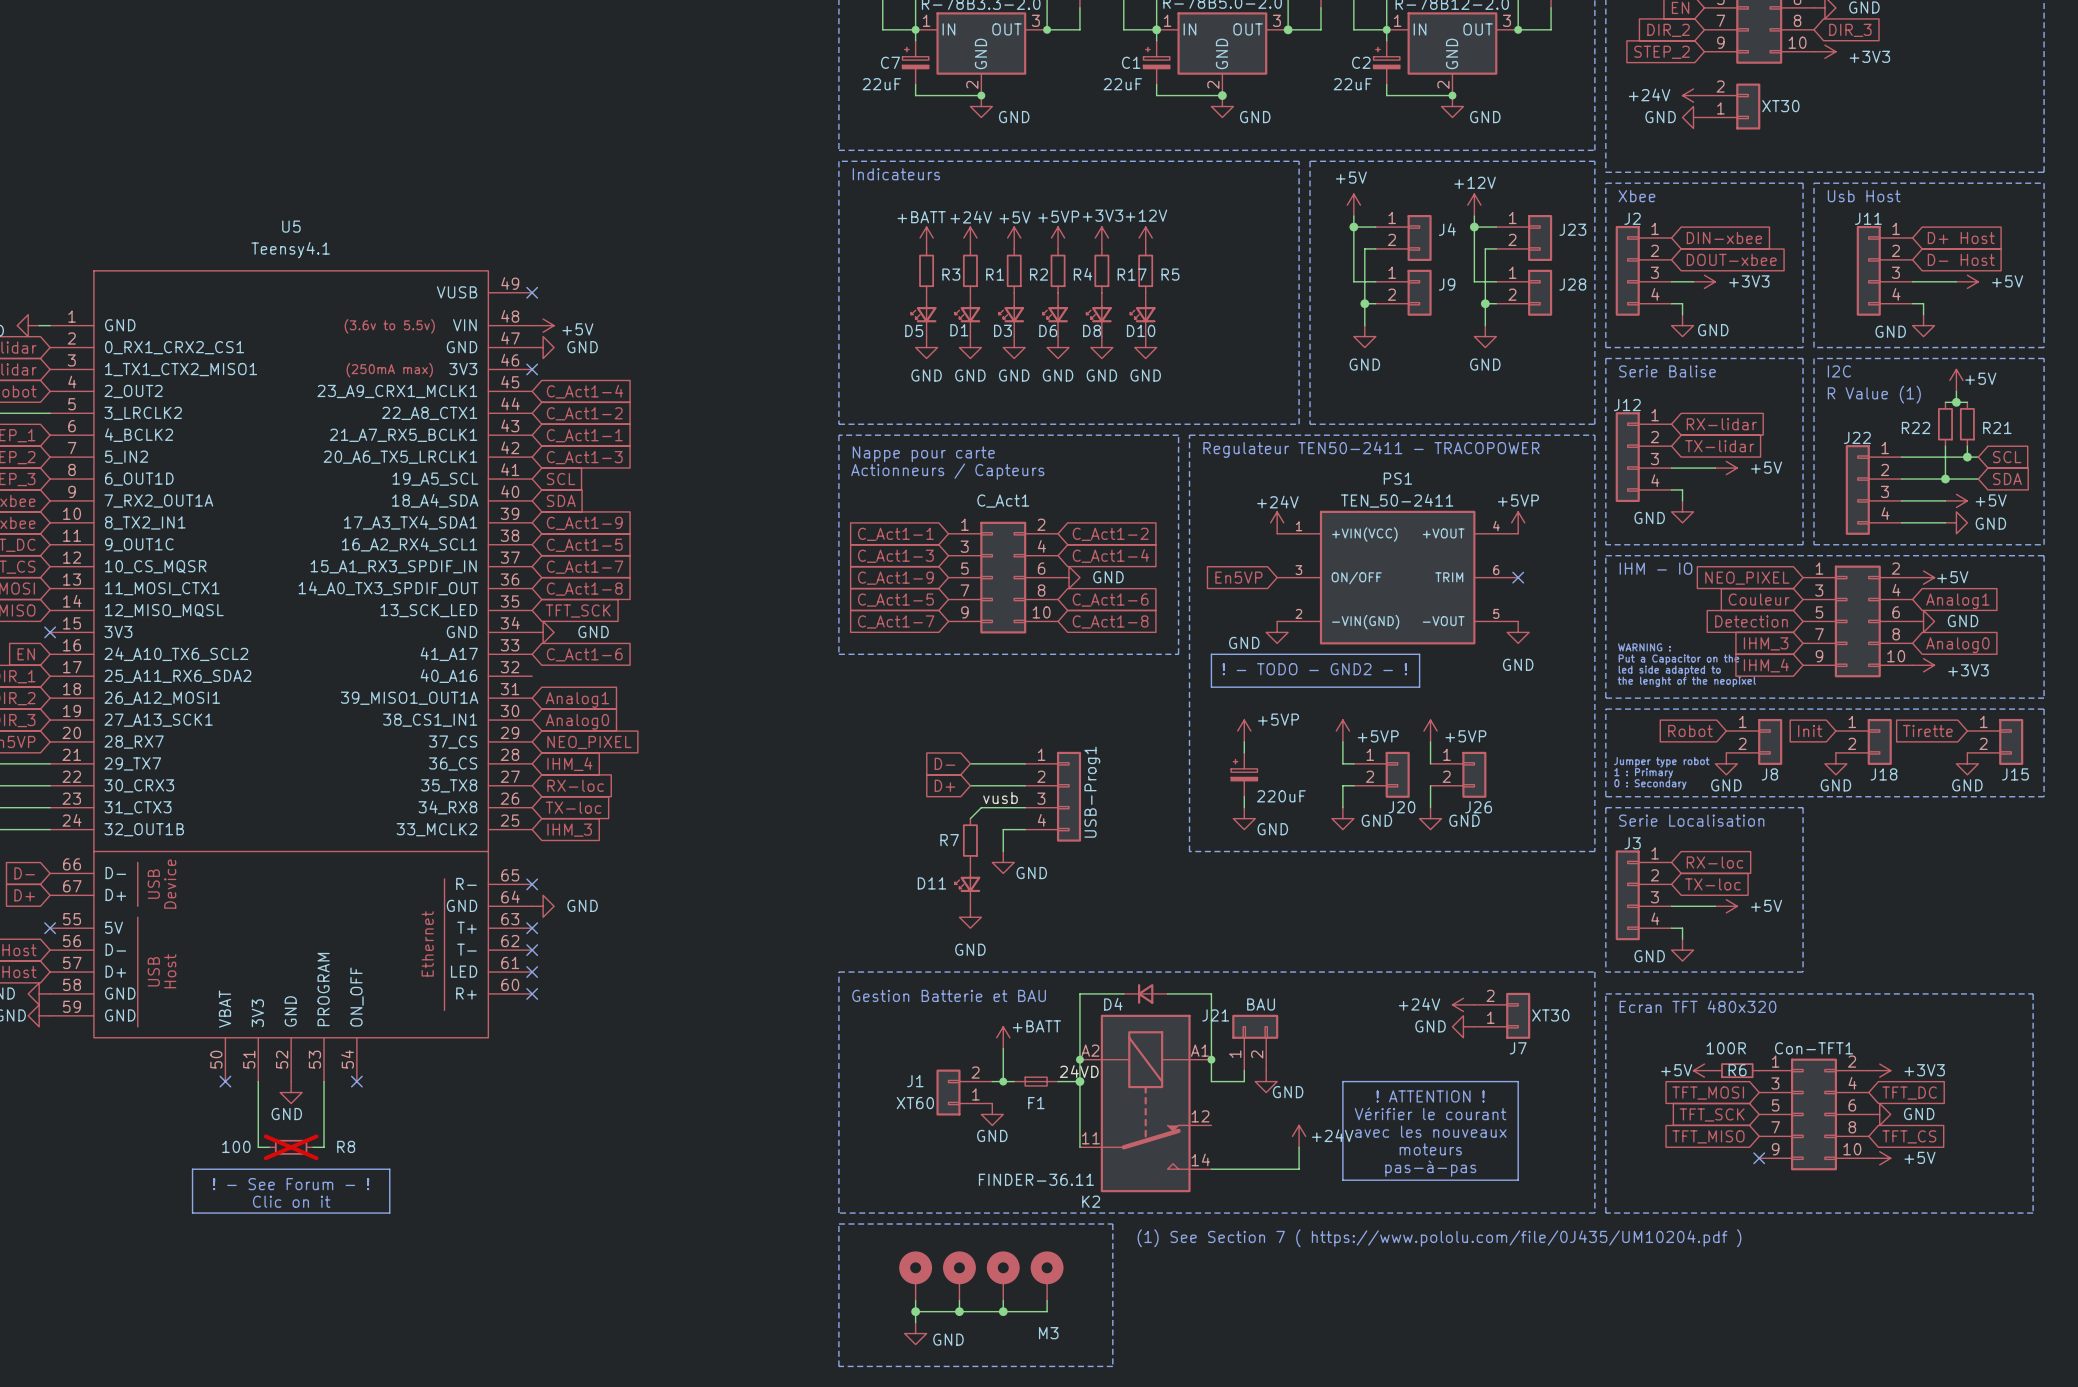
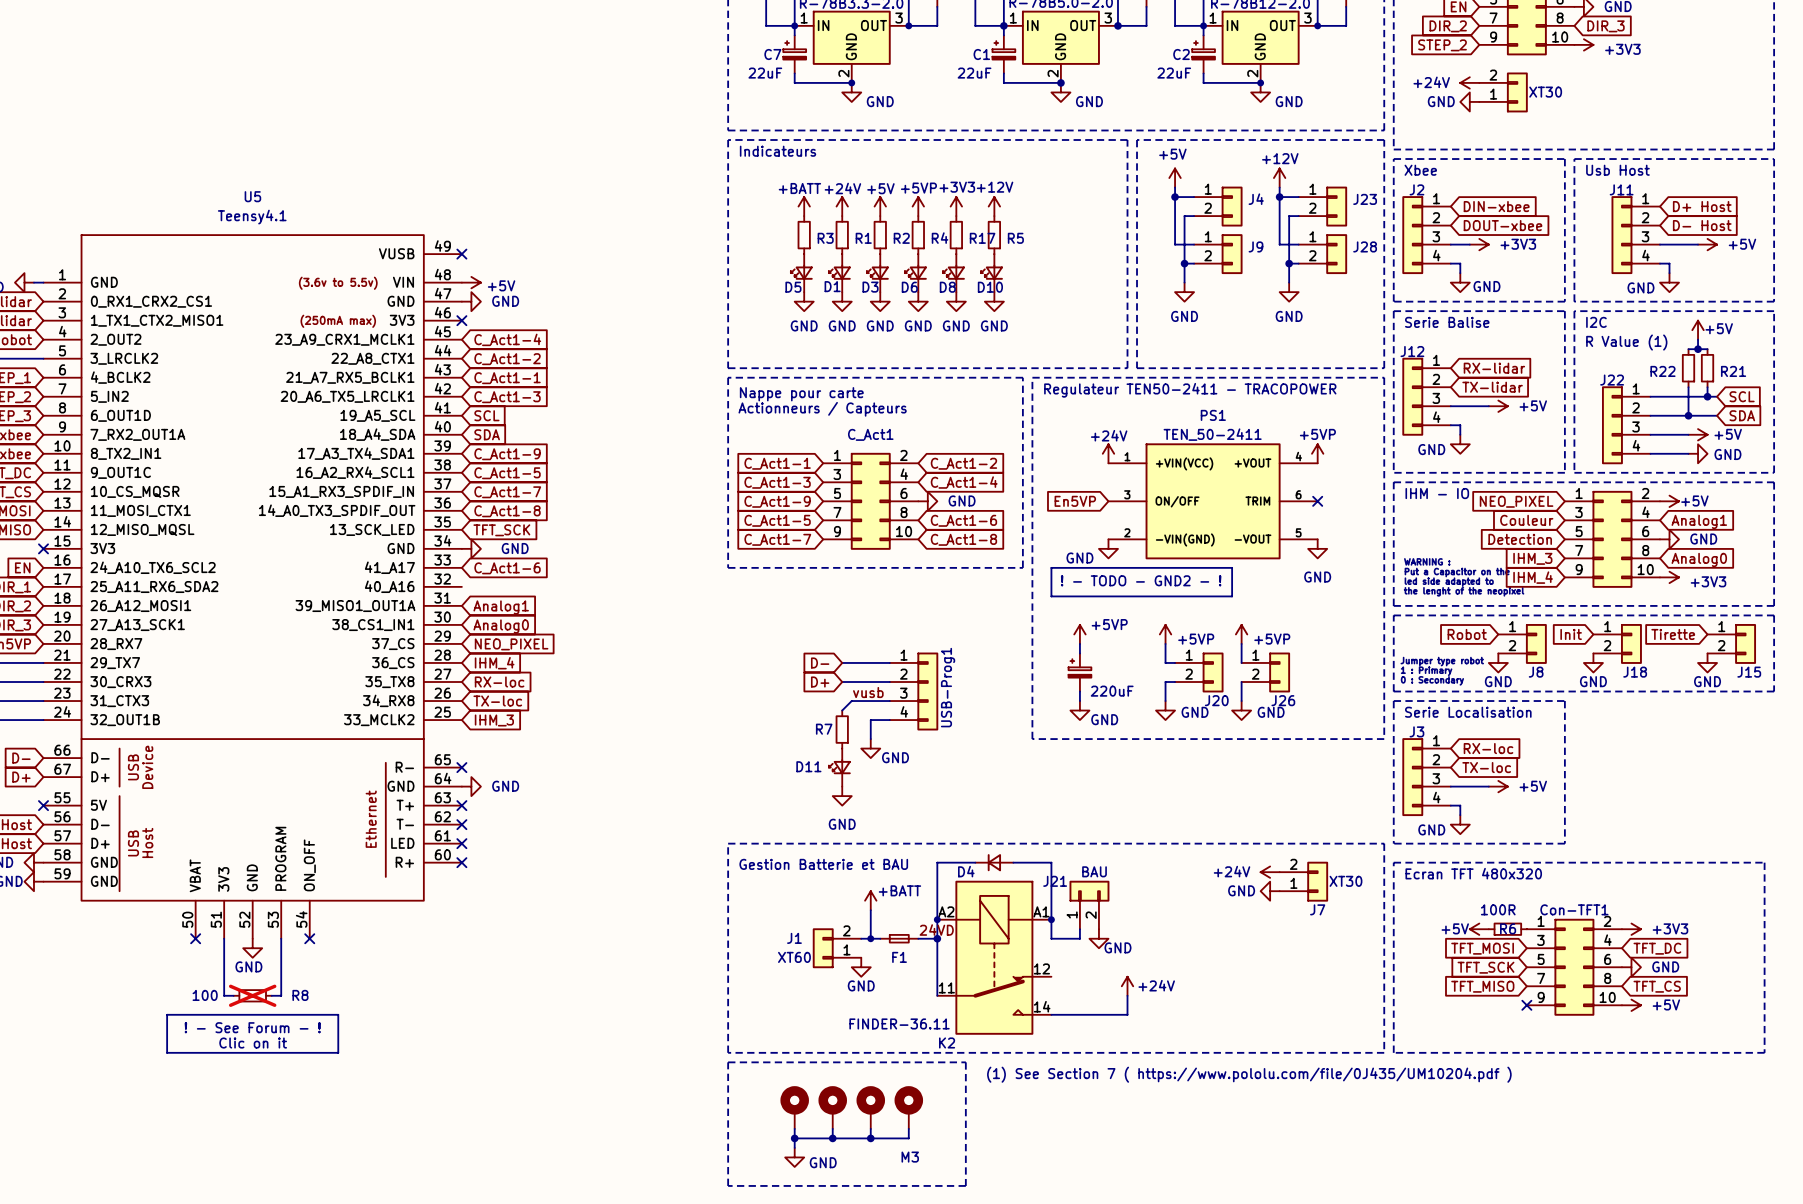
line: (1342, 1081) (1518, 1081) (1518, 1180) (1342, 1180) (1342, 1081) -> none
text: ! ATTENTION ! (1430, 1096) -> none
text: Vérifier le courant (1430, 1113) -> none
text: avec les nouveaux (1430, 1131) -> none
text: moteurs (1430, 1149) -> none
text: pas-à-pas (1430, 1168) -> none

